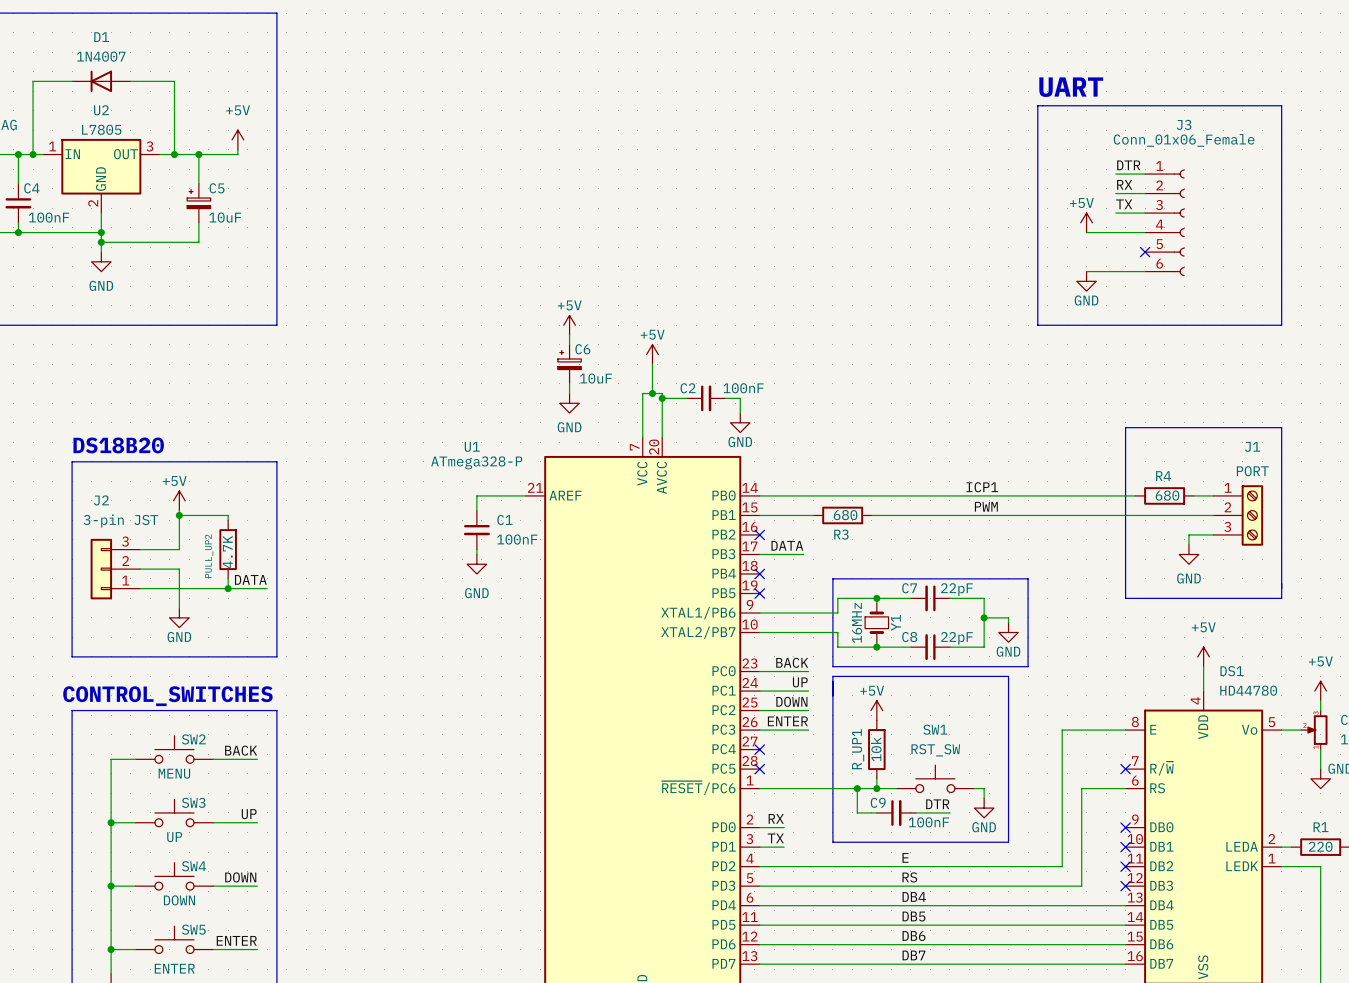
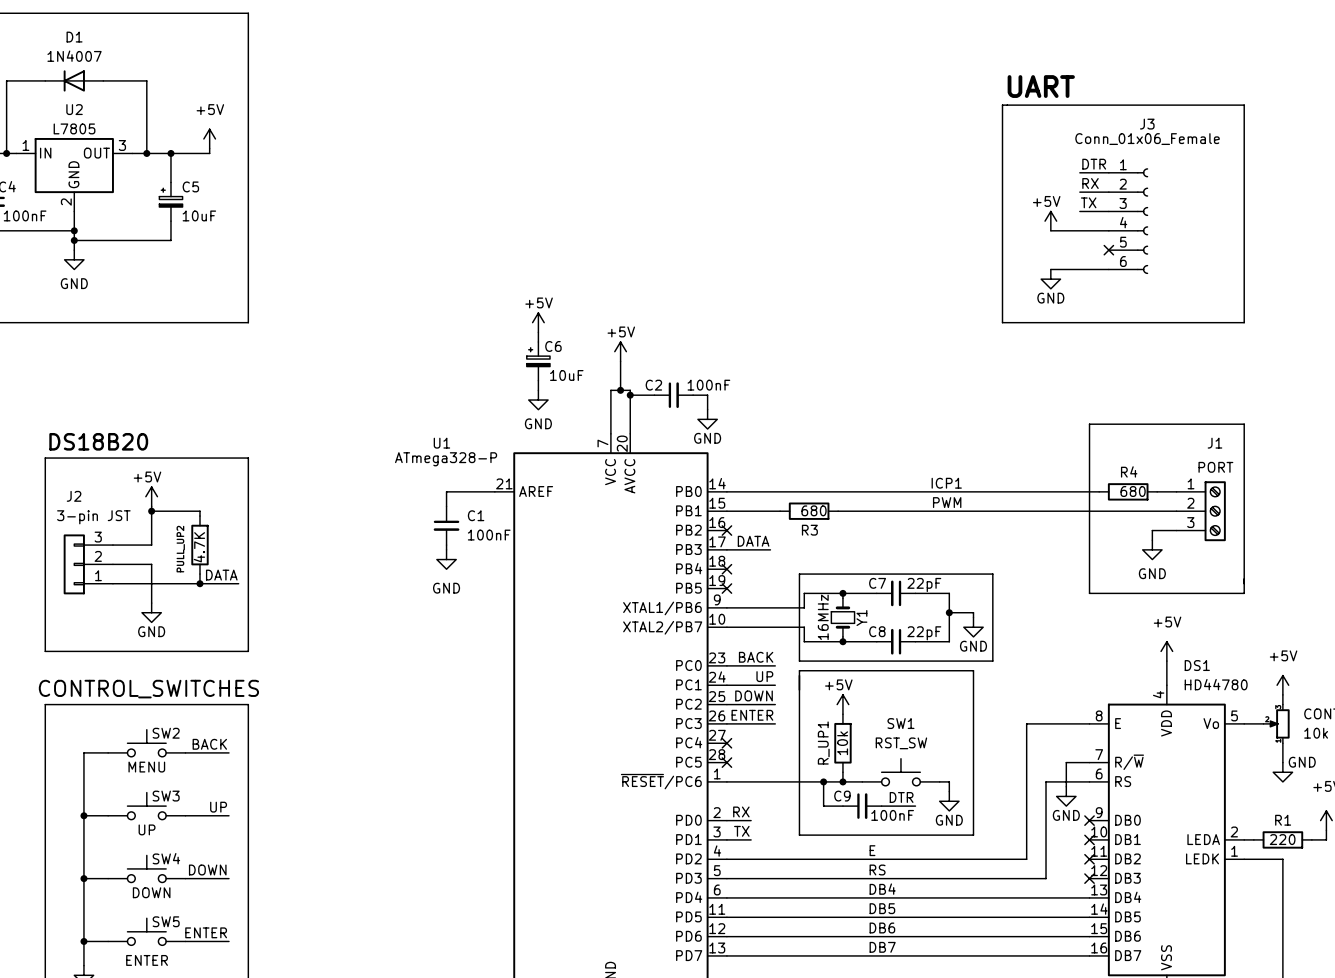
wire: none -> (1089, 762) (1066, 762) (1066, 786)
no-connect mark: (1125, 769) -> none
power symbol: none -> GND (1066, 796)

